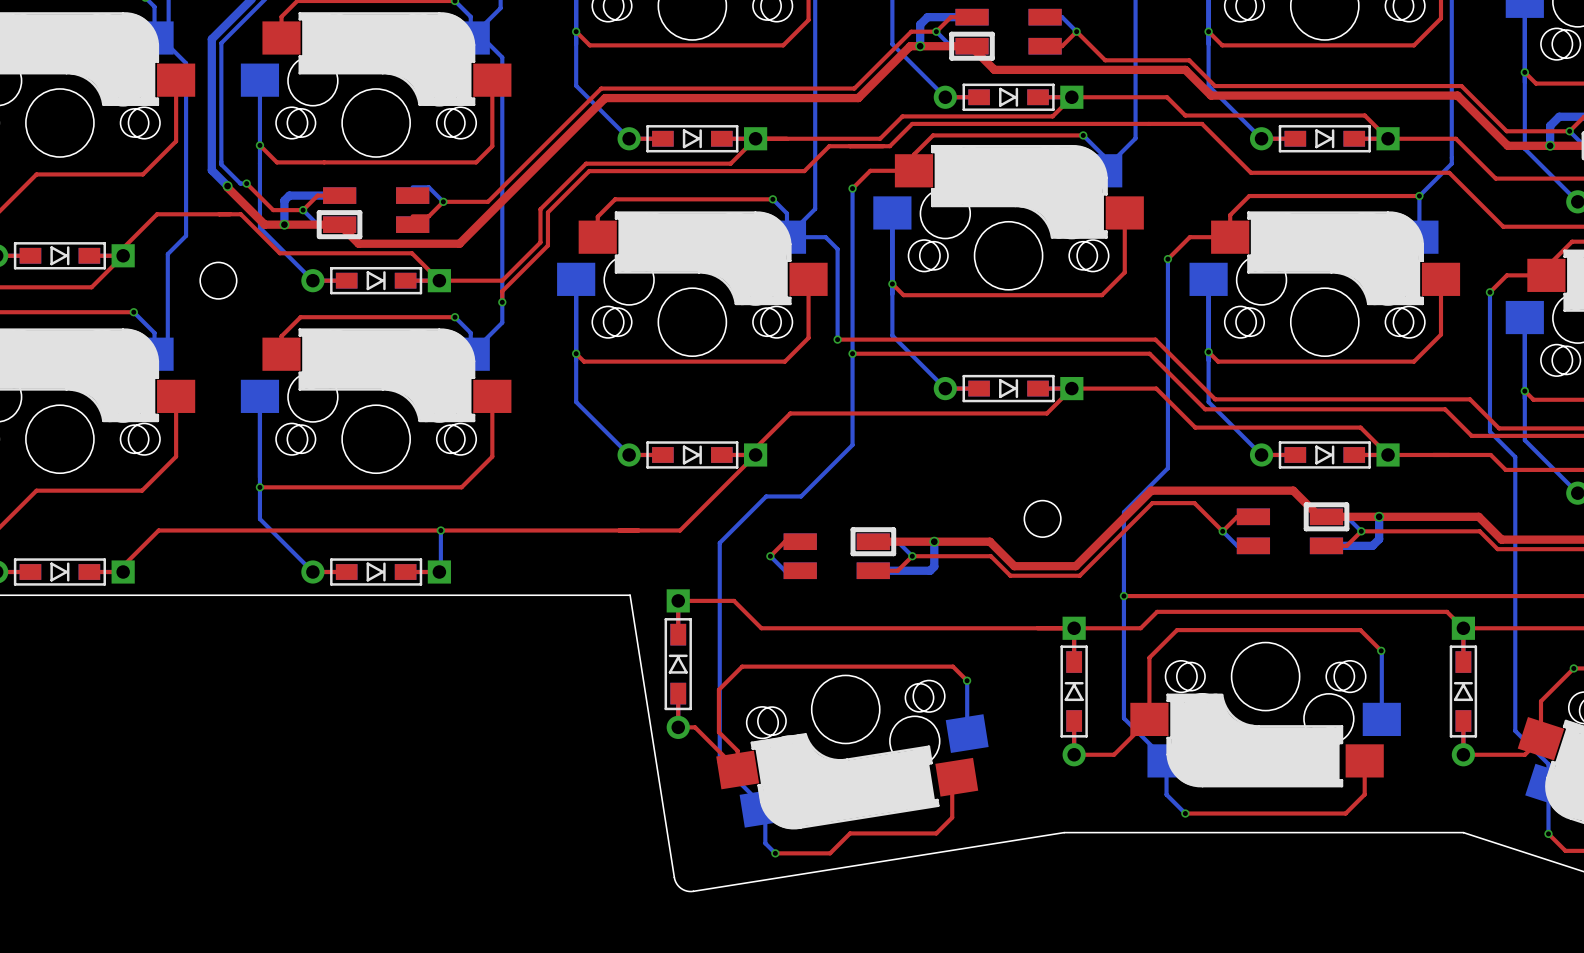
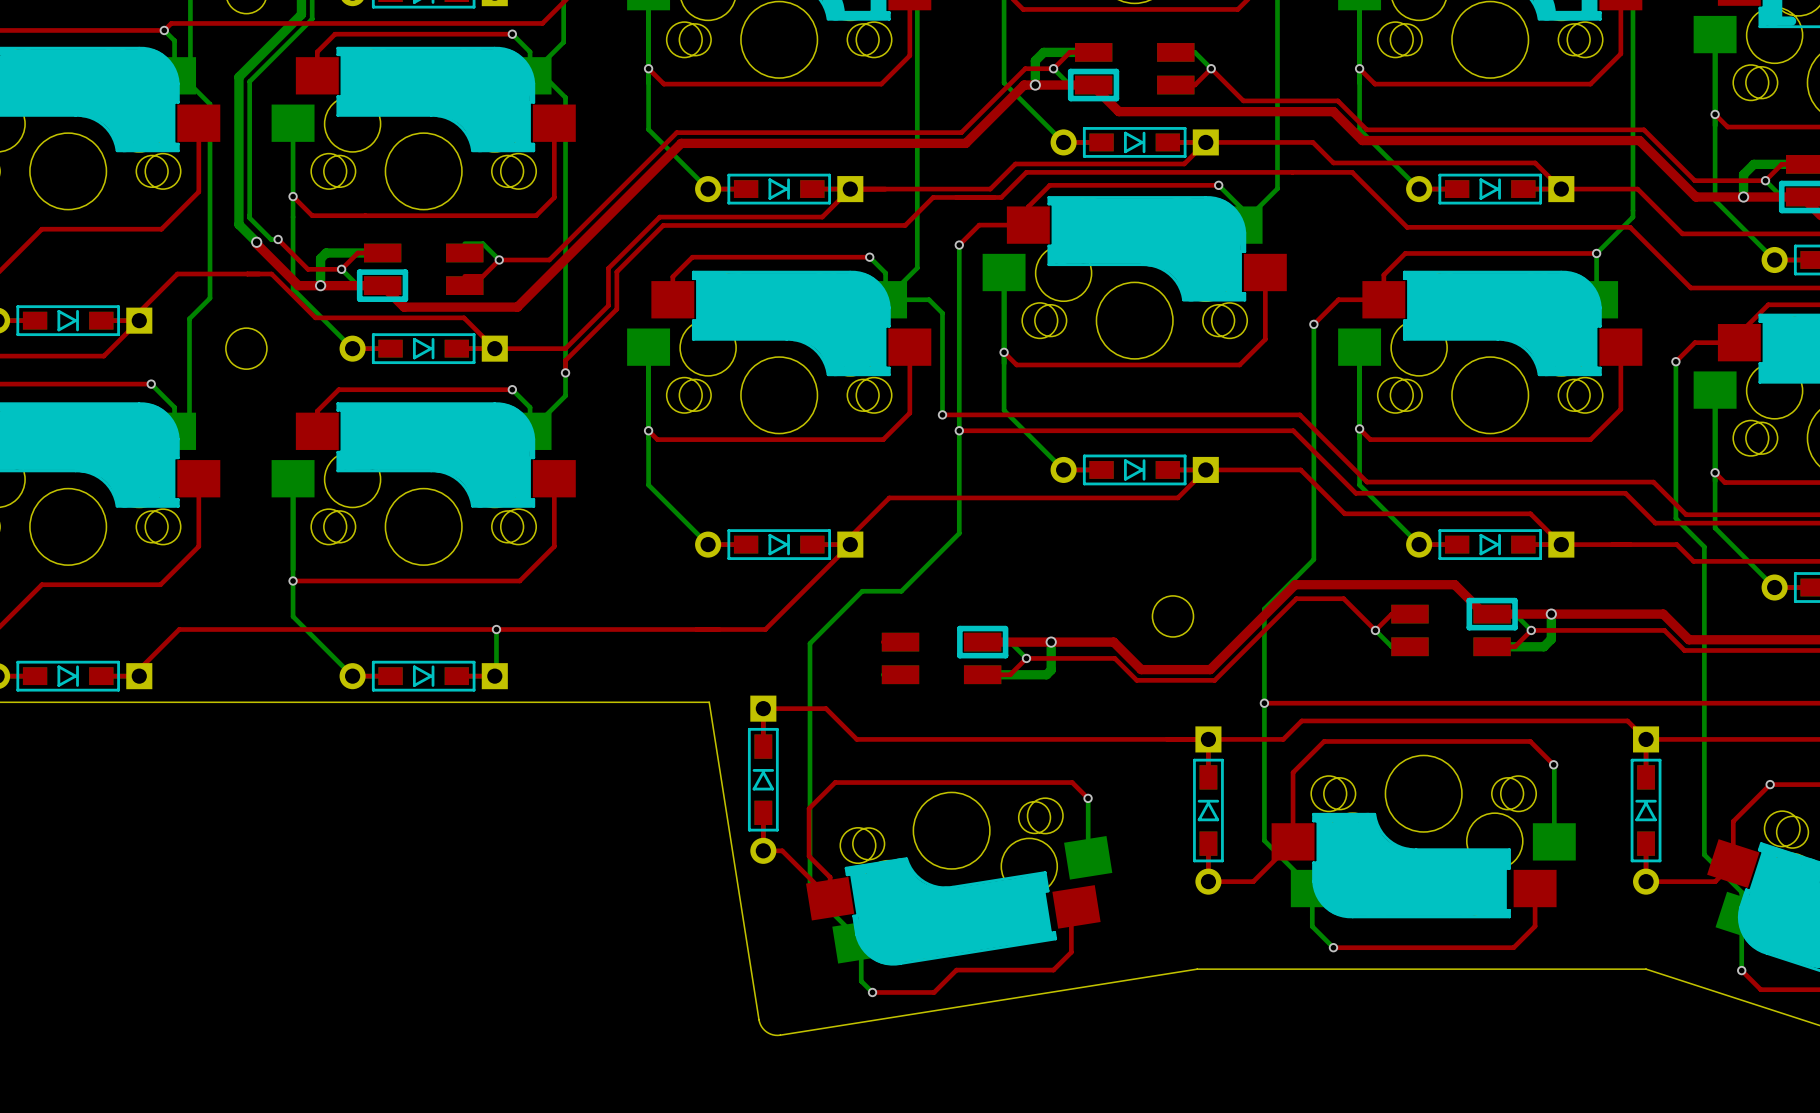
top track: (784, 541) (770, 556) -> none
bottom track: (770, 556) (784, 570) -> none
via: (770, 556) -> none

